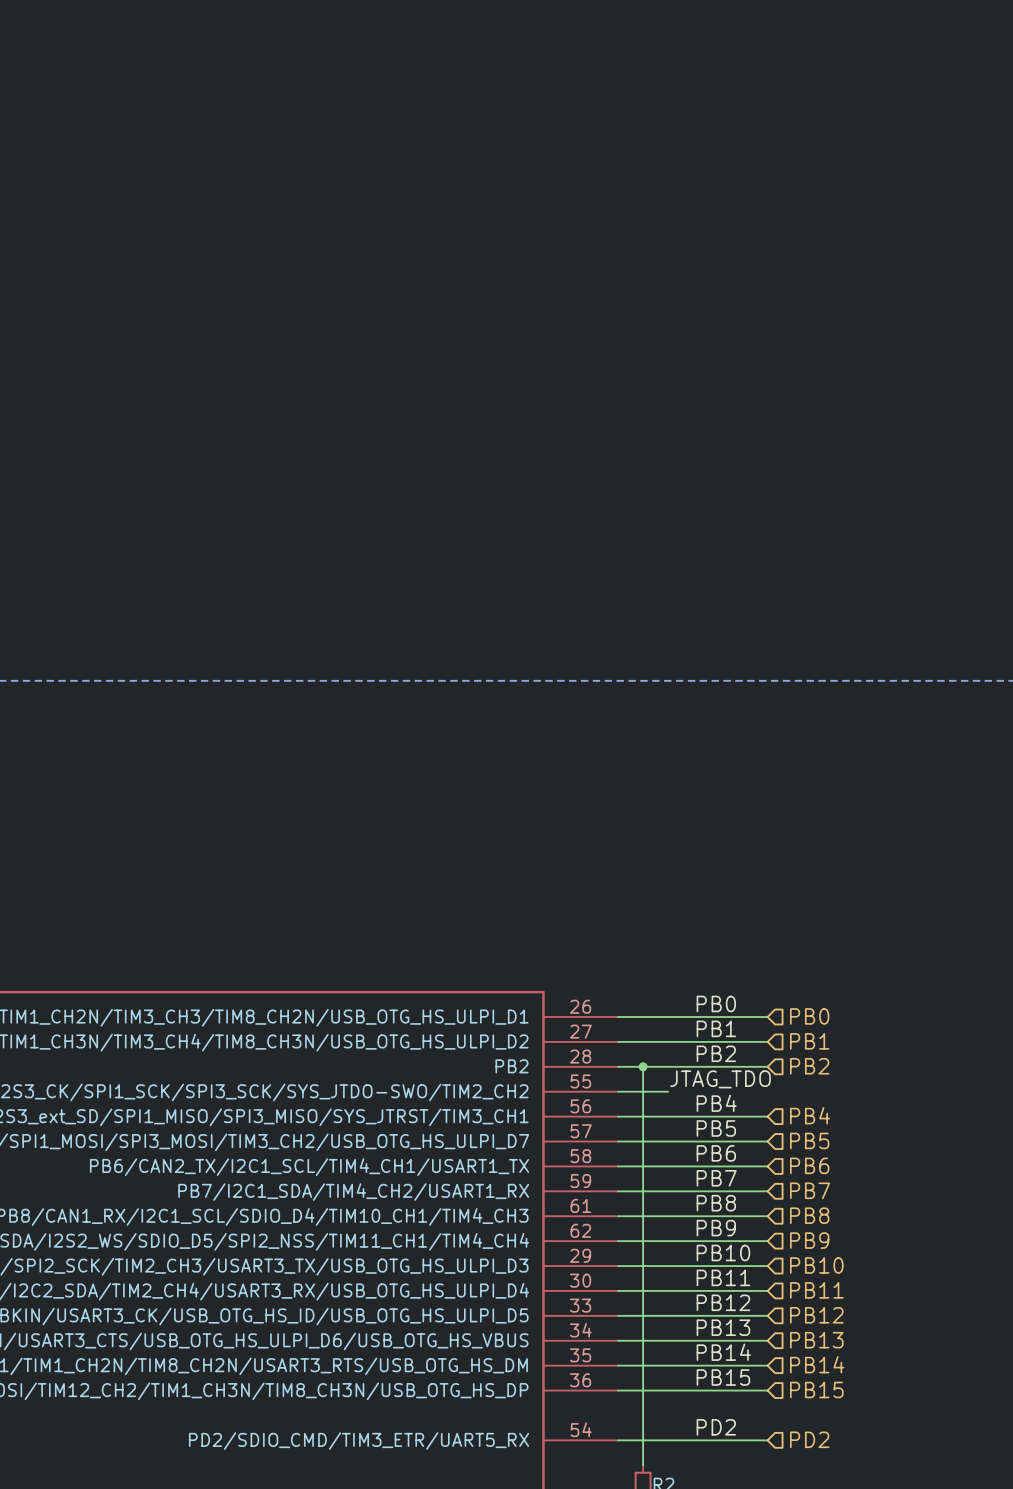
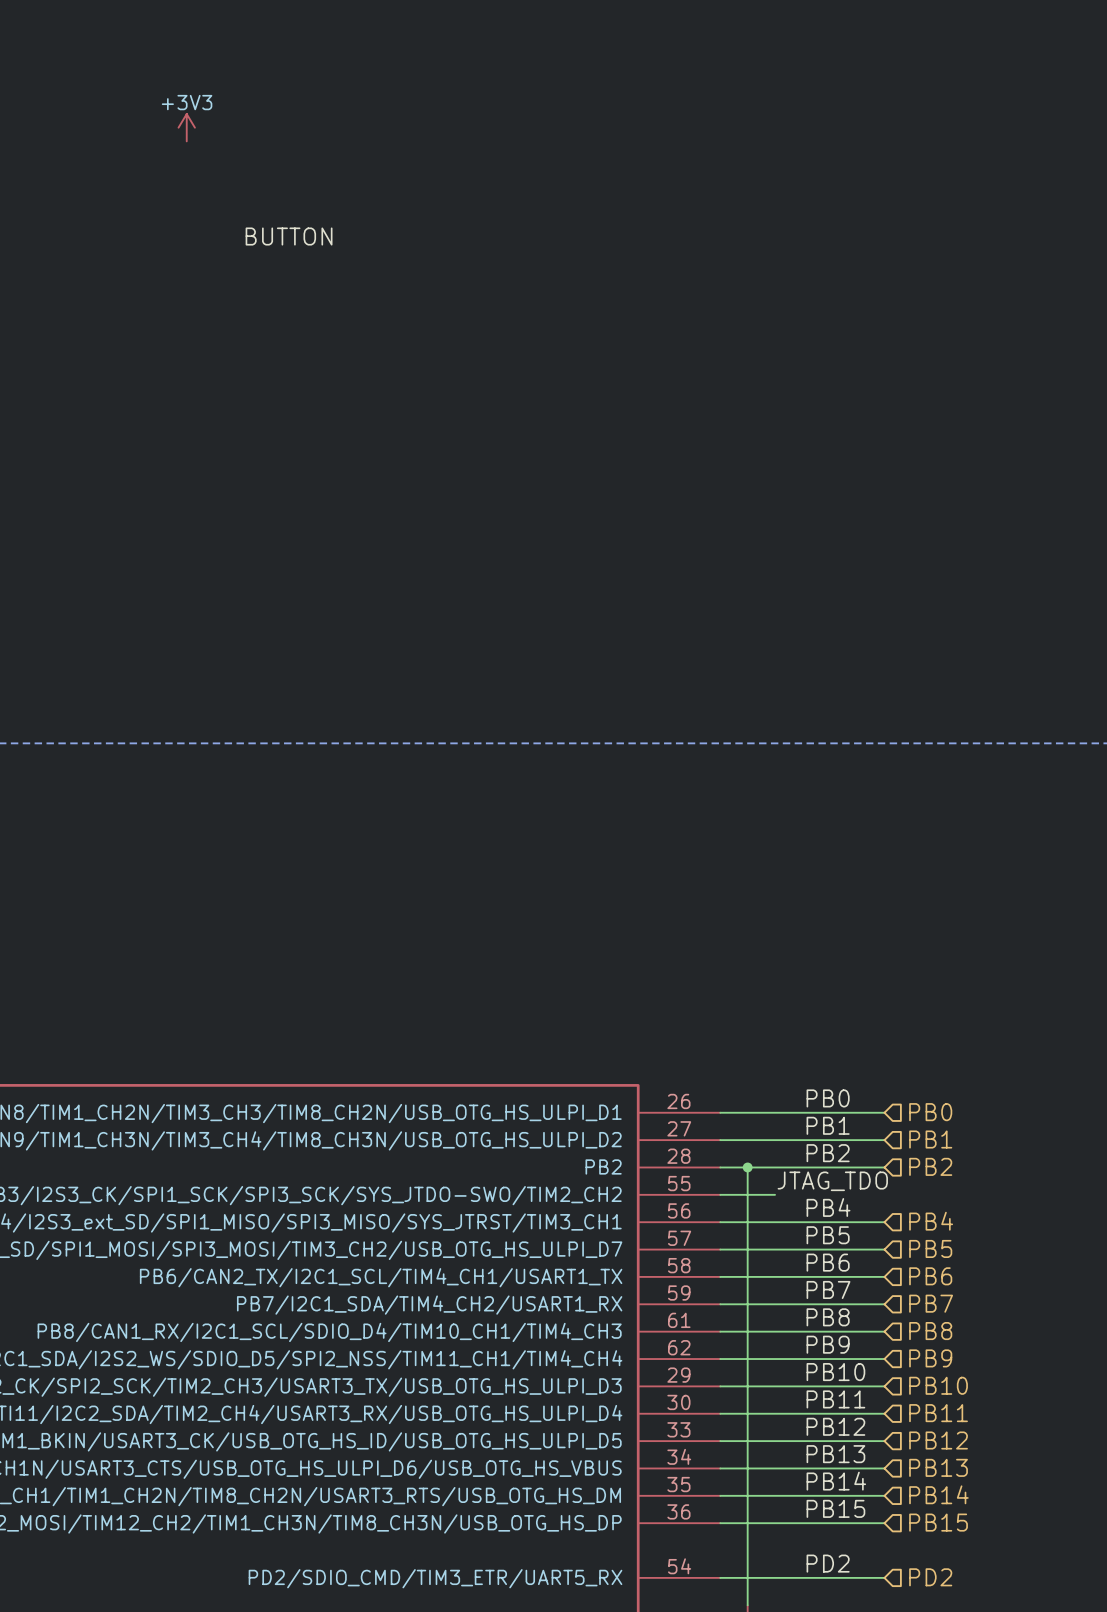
power symbol: none -> +3V3 (186, 127)
label: none -> BUTTON (289, 236)

